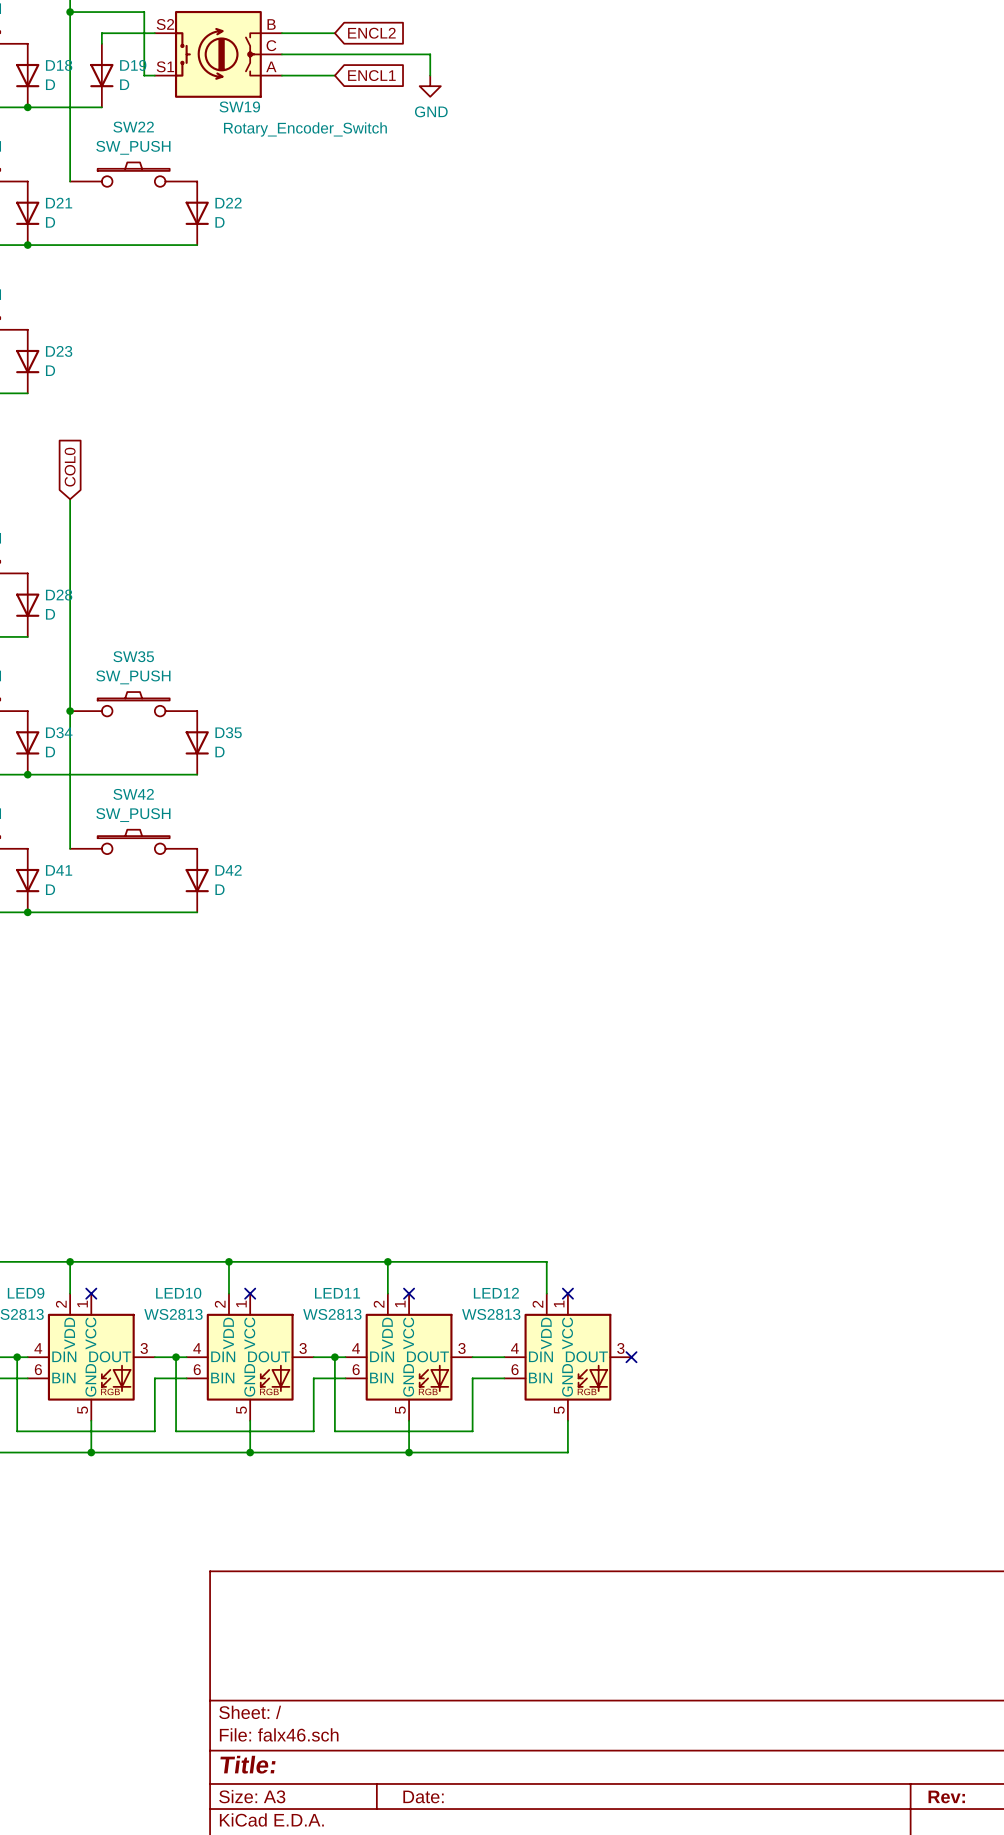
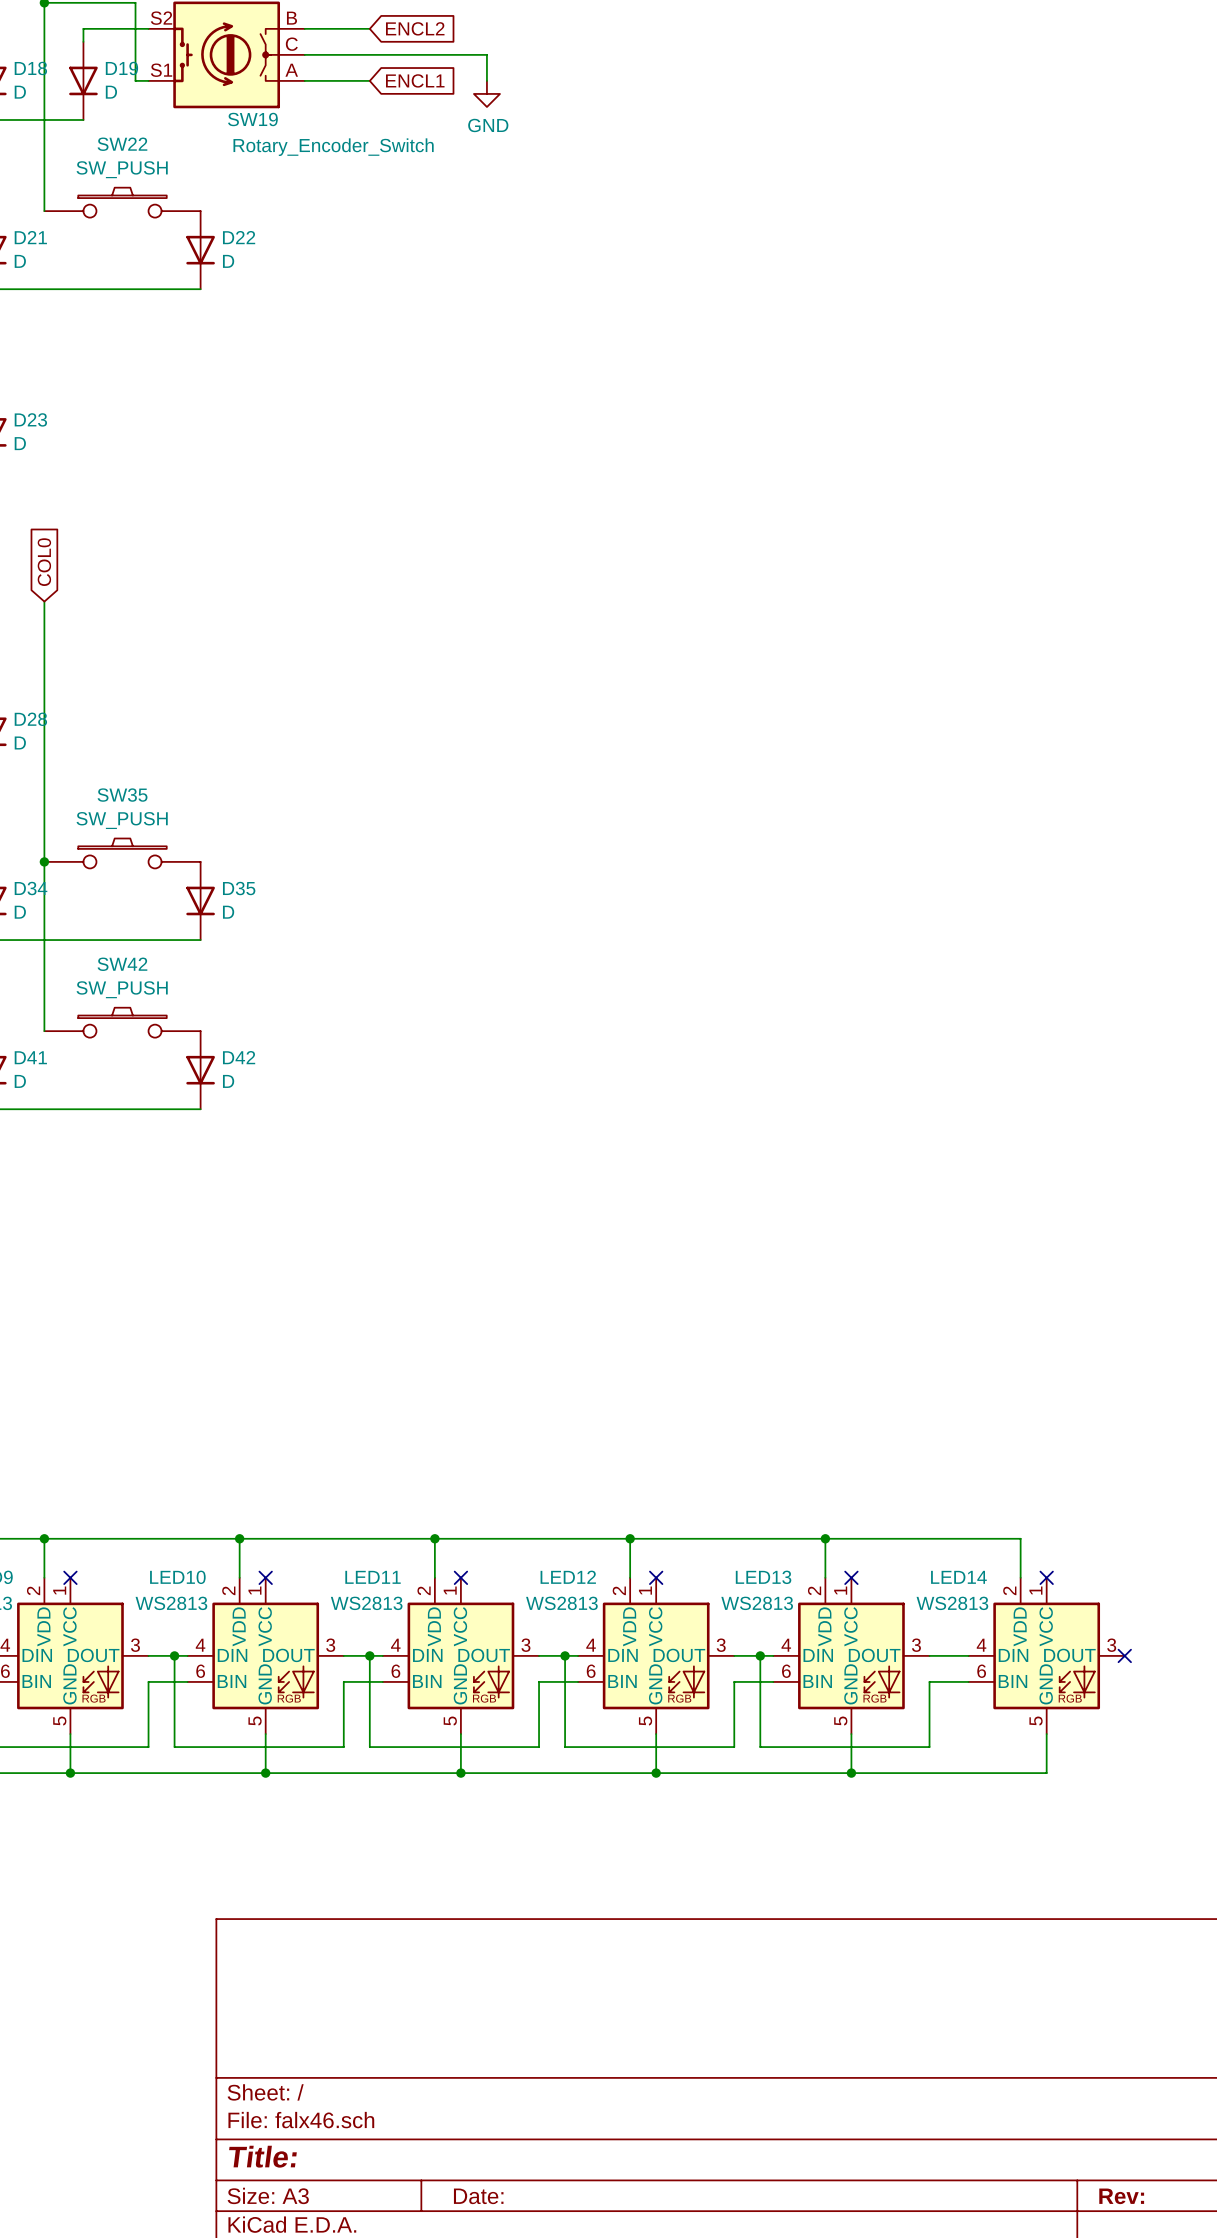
wire: none -> (630, 1538) (1020, 1538) (1020, 1577)
junction: none -> (630, 1538)
wire: none -> (825, 1538) (825, 1577)
junction: none -> (825, 1538)
no-connect mark: none -> (851, 1577)
no-connect mark: none -> (1046, 1577)
wire: none -> (565, 1655) (565, 1747) (734, 1747) (734, 1681) (773, 1681)
junction: none -> (565, 1655)
wire: none -> (734, 1655) (773, 1655)
no-connect mark: (631, 1357) -> none
wire: none -> (760, 1655) (760, 1747) (929, 1747) (929, 1681) (968, 1681)
junction: none -> (760, 1655)
LED13: none -> WS2813 (851, 1655)
wire: none -> (929, 1655) (968, 1655)
LED14: none -> WS2813 (1046, 1655)
no-connect mark: none -> (1124, 1655)
wire: none -> (851, 1734) (851, 1773)
wire: none -> (1046, 1734) (1046, 1773) (656, 1773)
junction: none -> (656, 1773)
junction: none -> (851, 1773)

